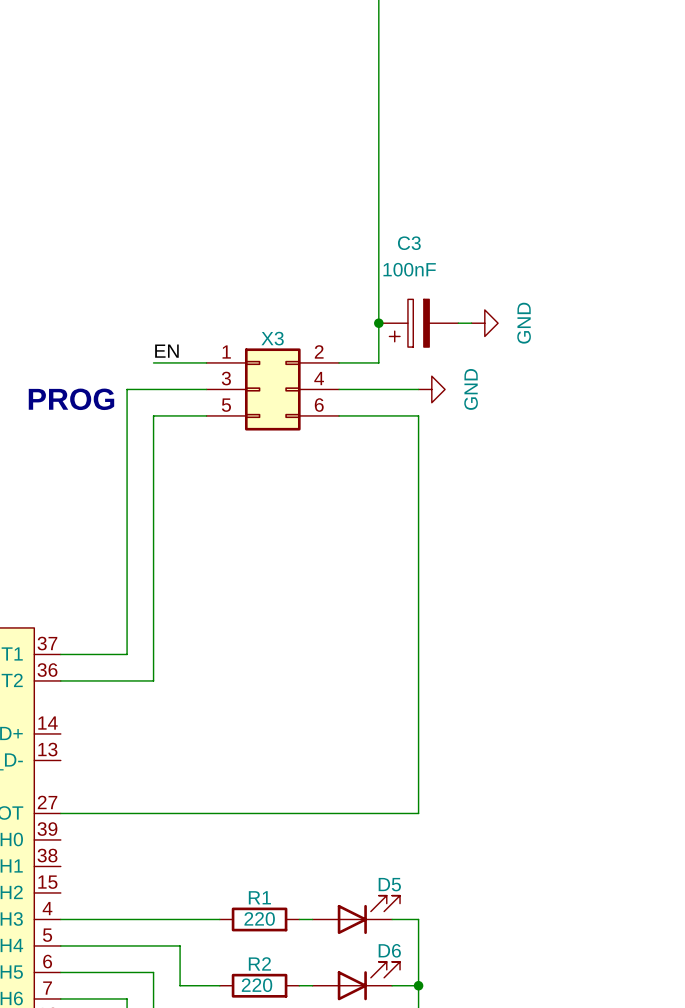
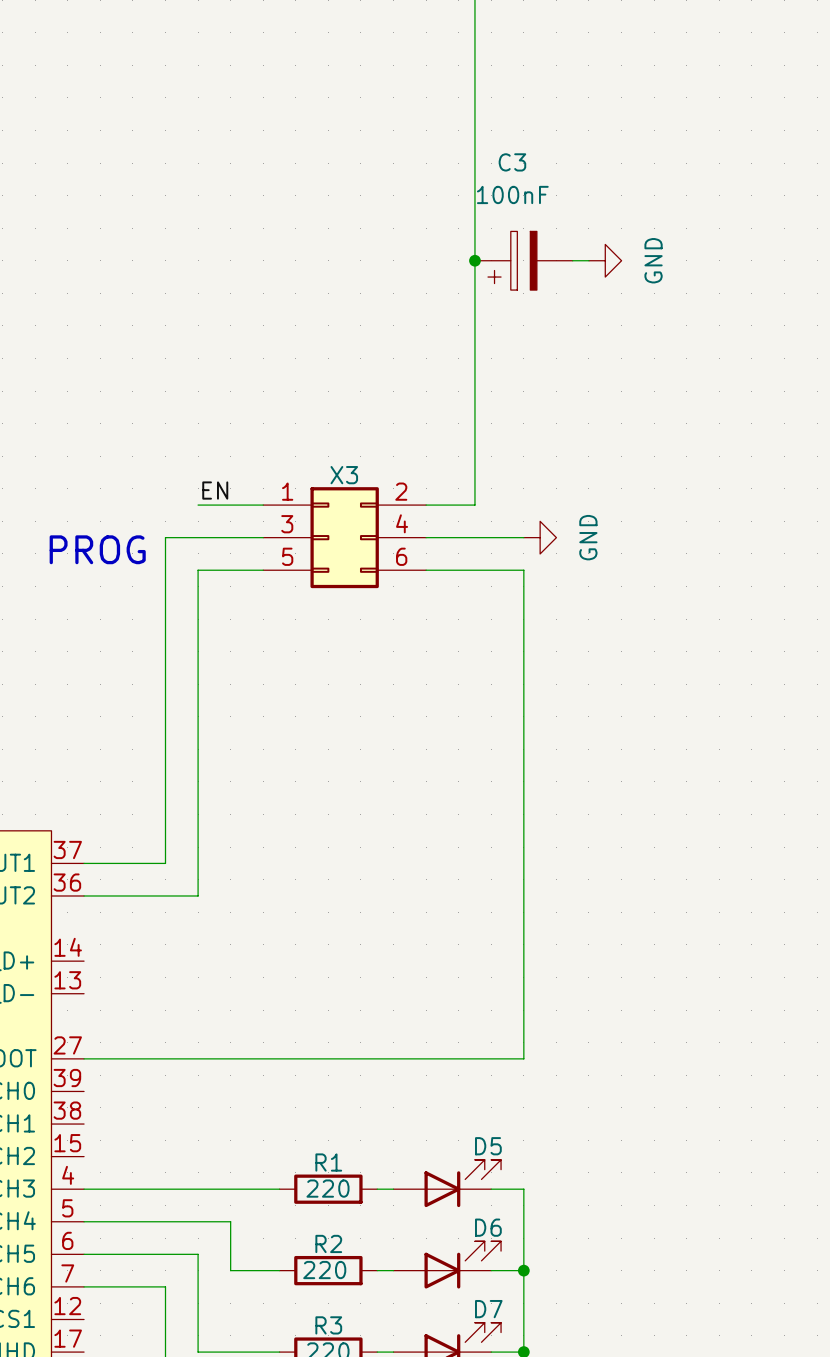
junction: none -> (474, 260)
junction: (378, 323) -> none
C3 position: (418, 323) -> (523, 260)
wire: (458, 323) (471, 323) -> (572, 260) (588, 260)
power symbol position: GND (484, 323) -> GND (605, 260)

